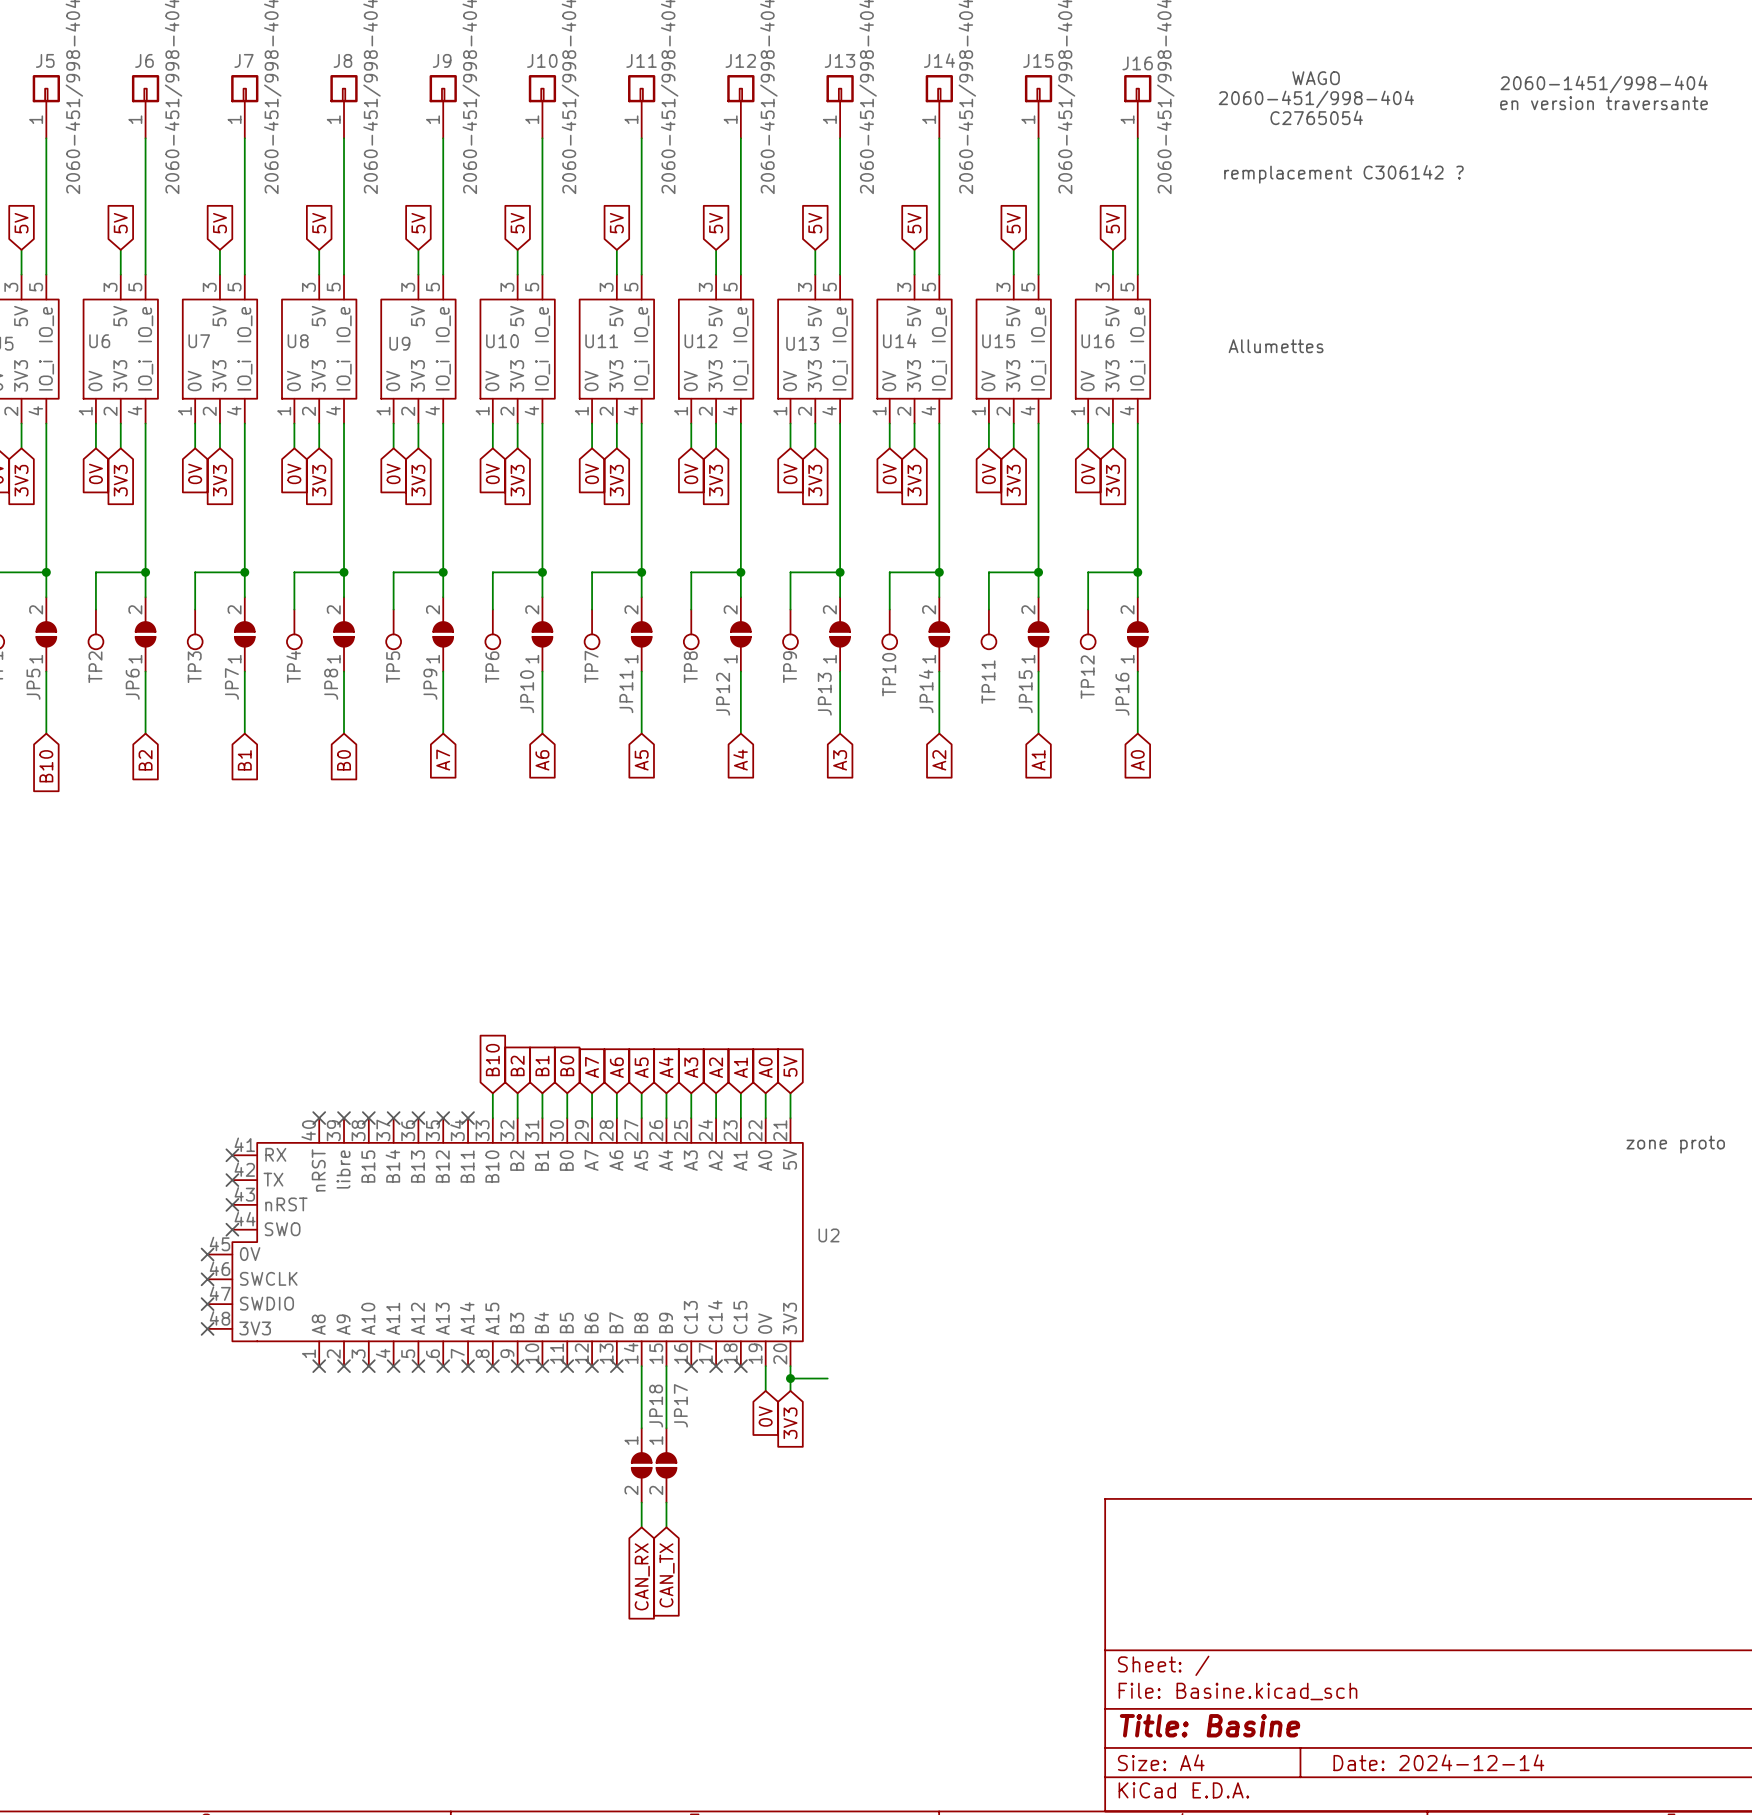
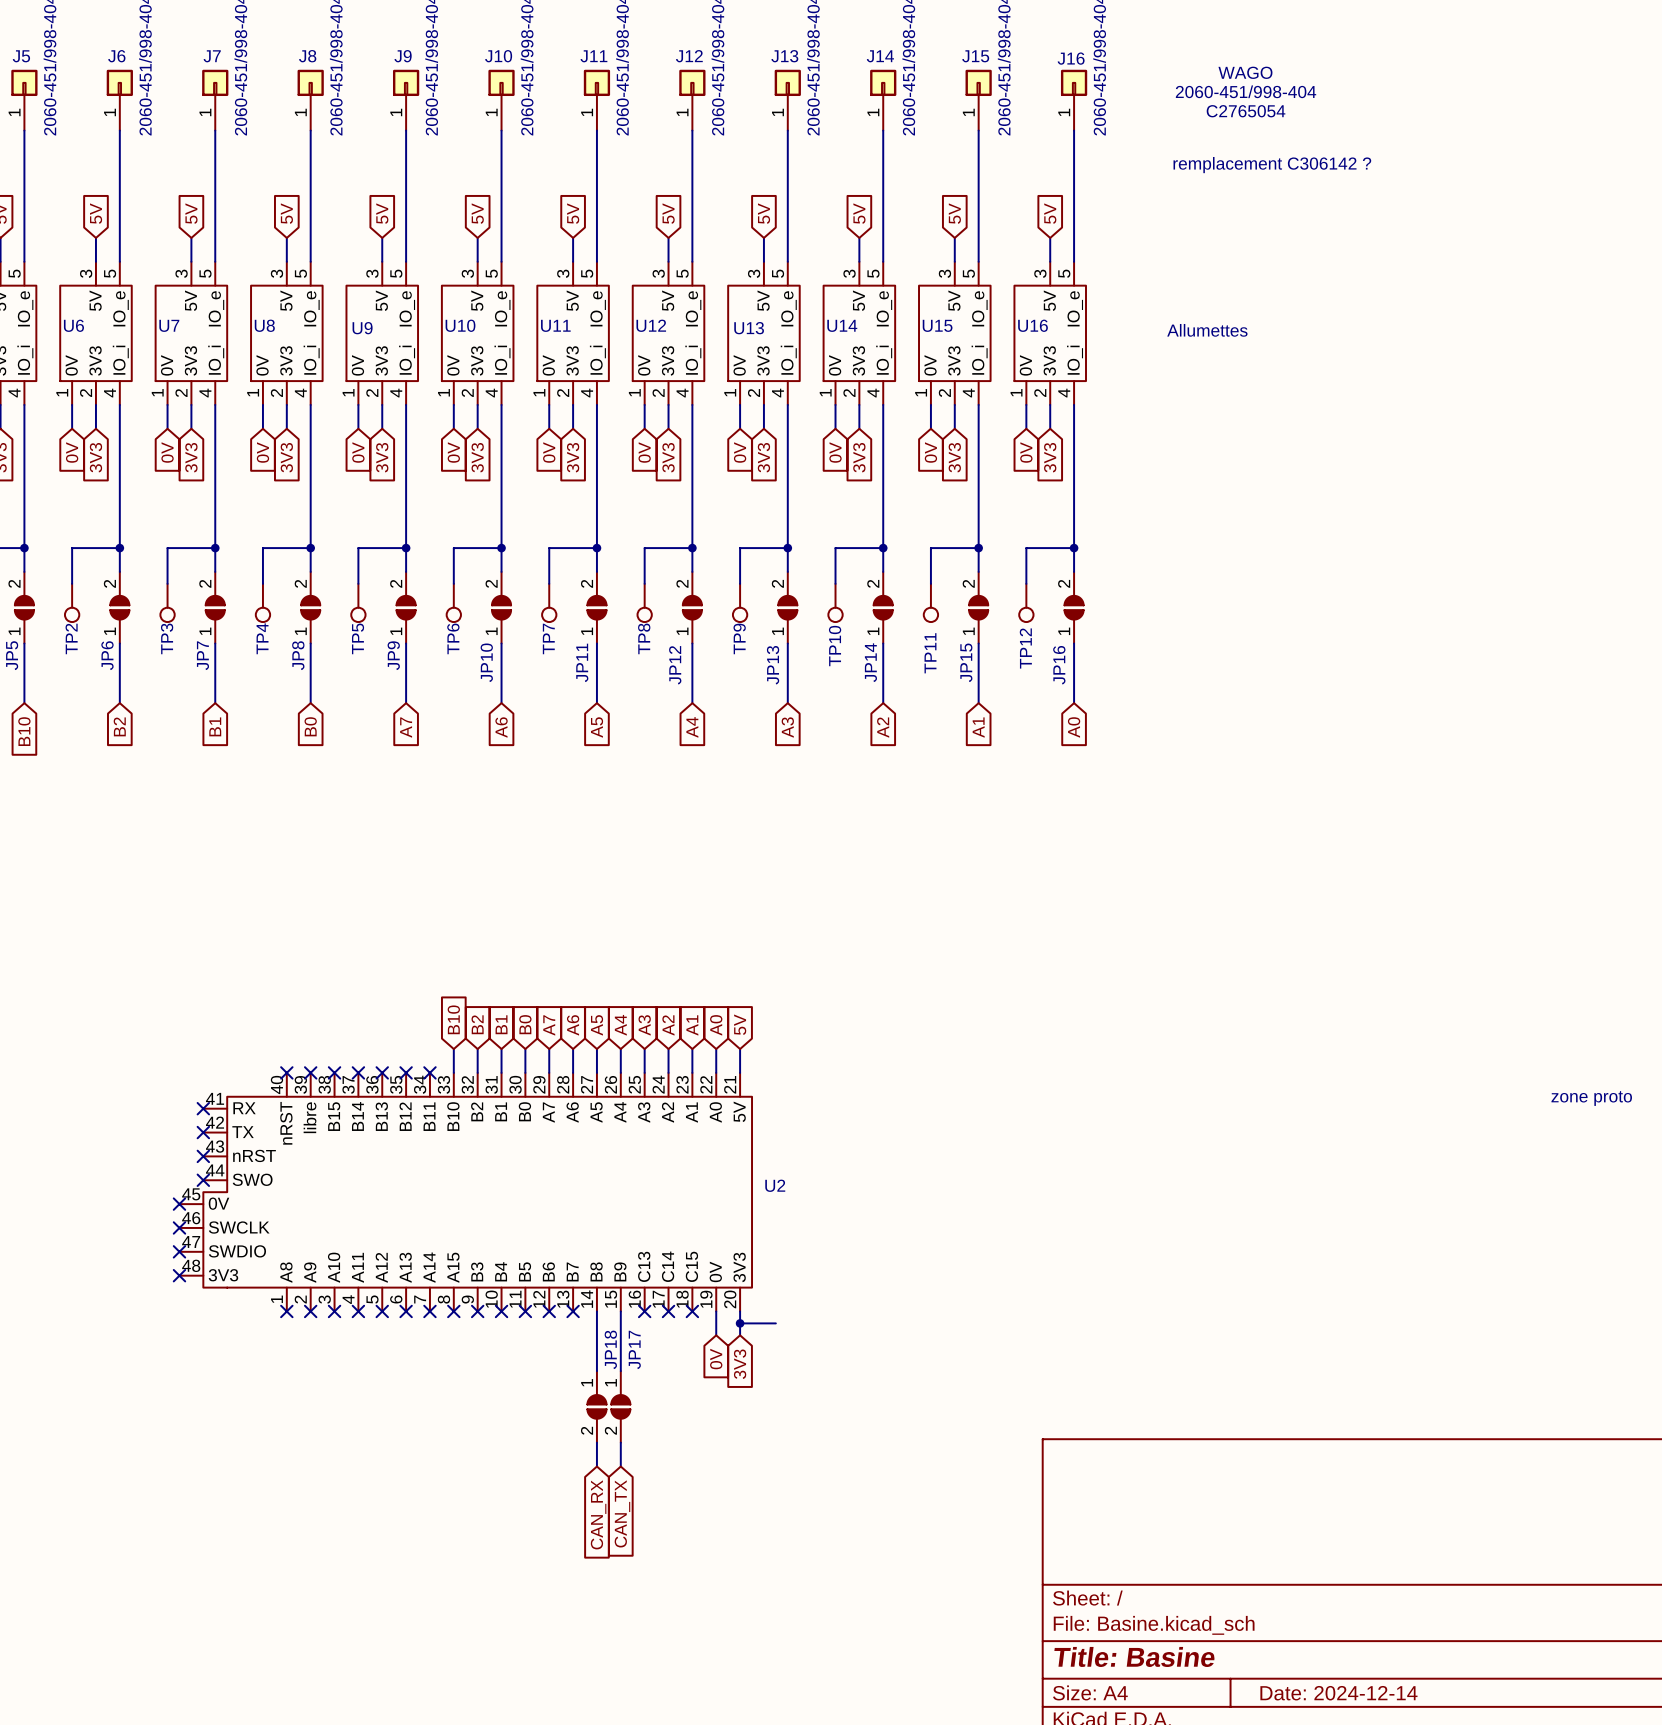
text: 2060-1451/998-404 (1604, 84) -> none
text: en version traversante (1604, 103) -> none

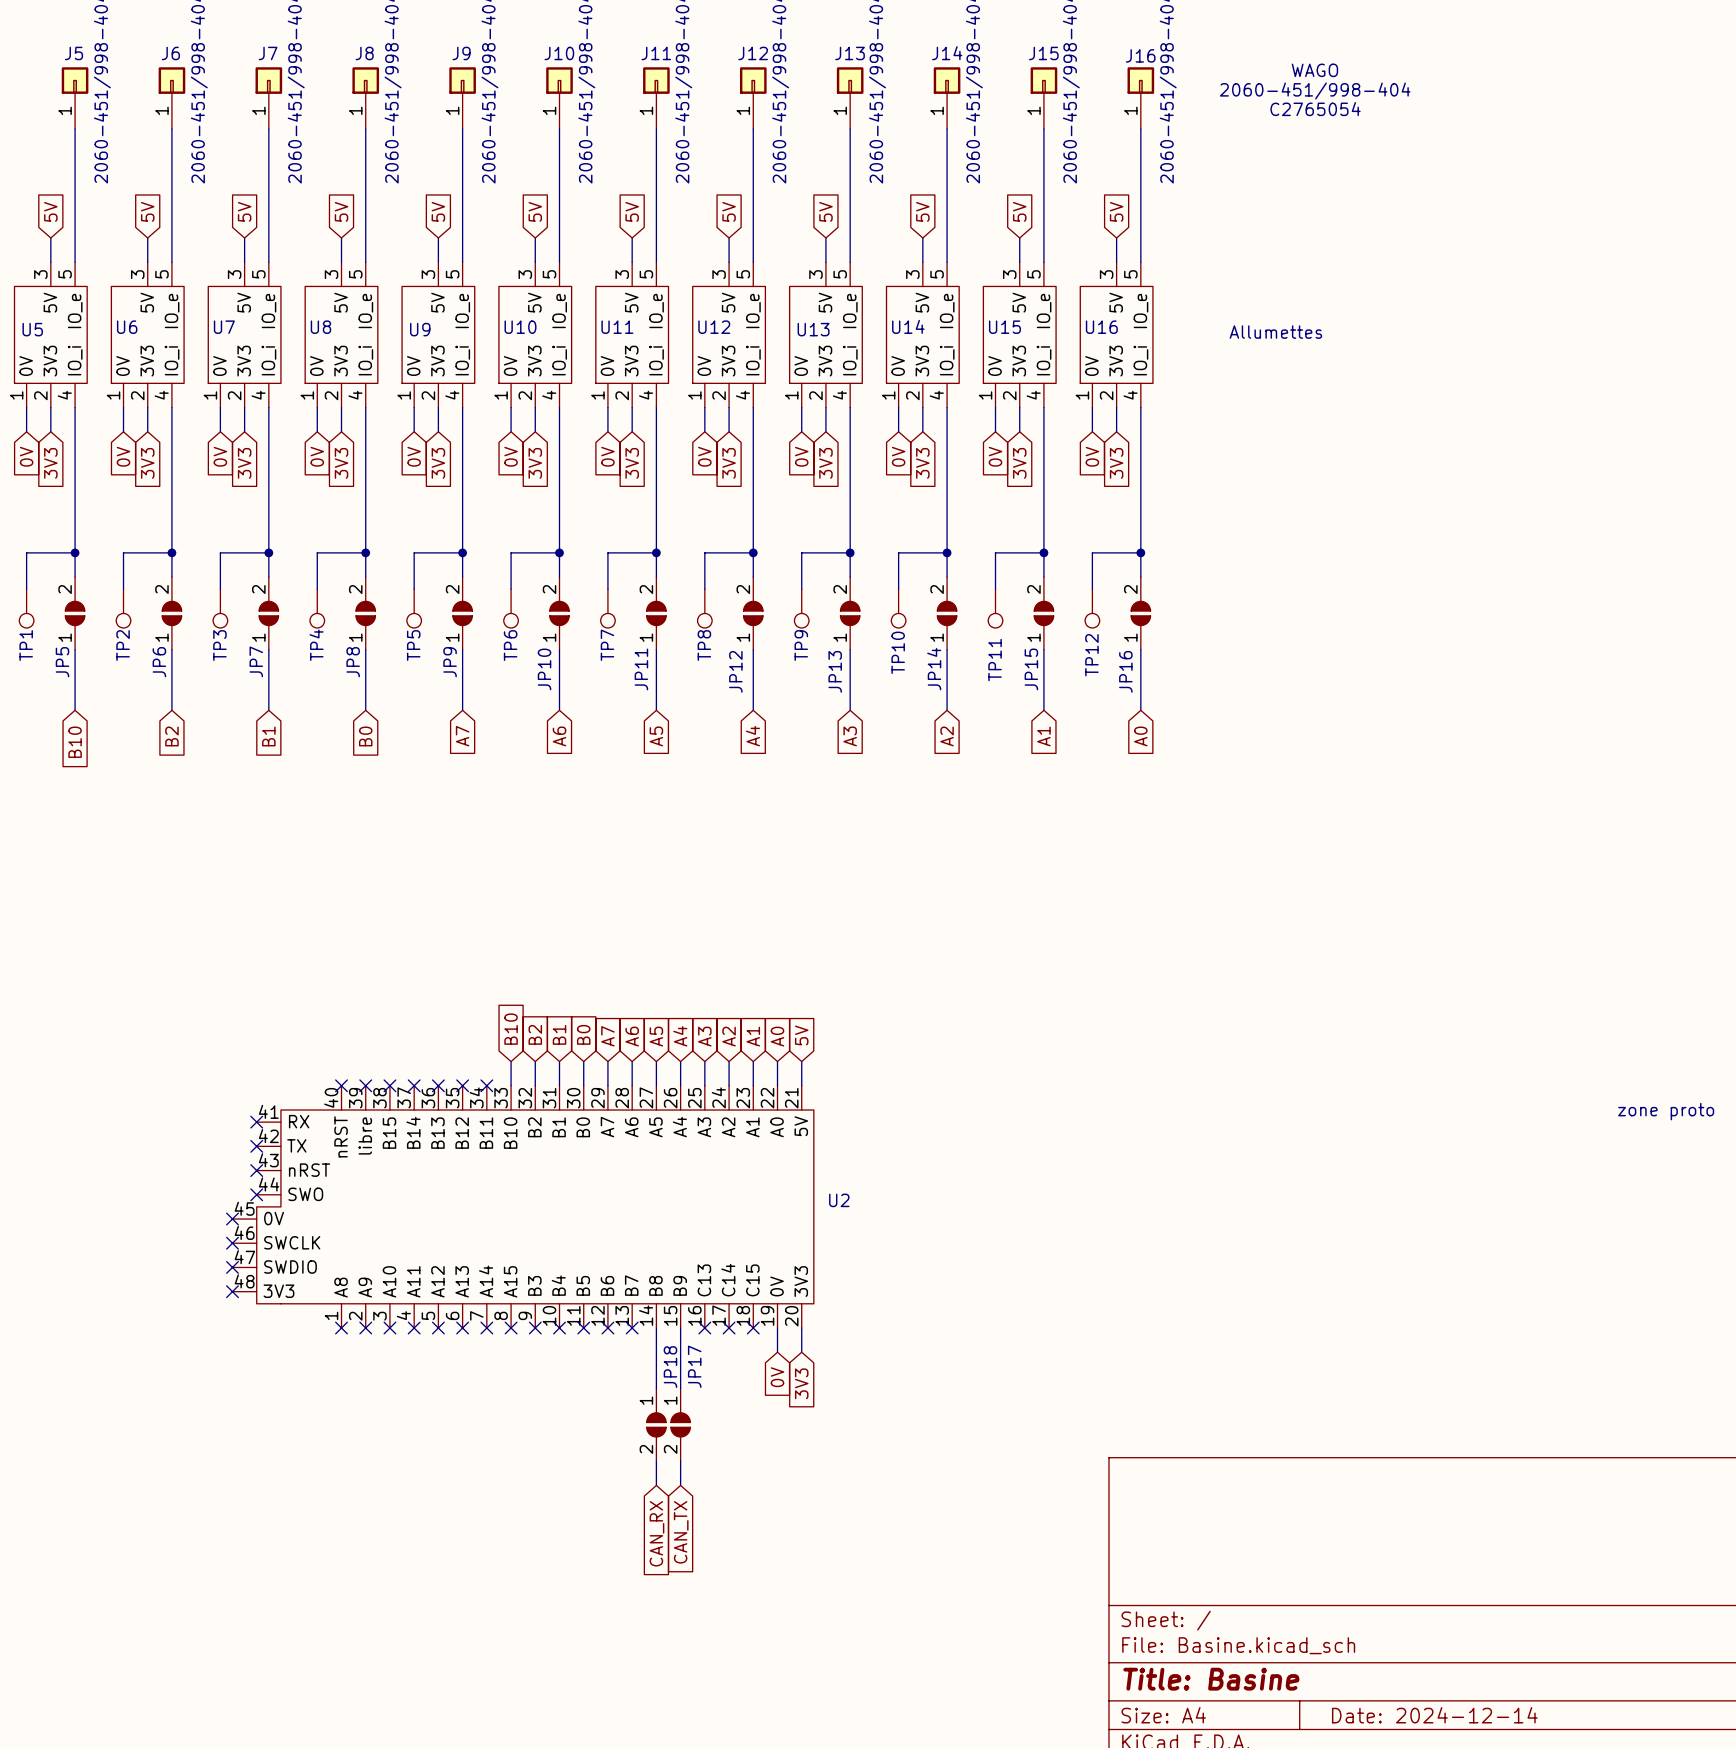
text: remplacement C306142 ? (1272, 165) -> none
wire: (740, 1323) (775, 1323) -> none
junction: (740, 1323) -> none

